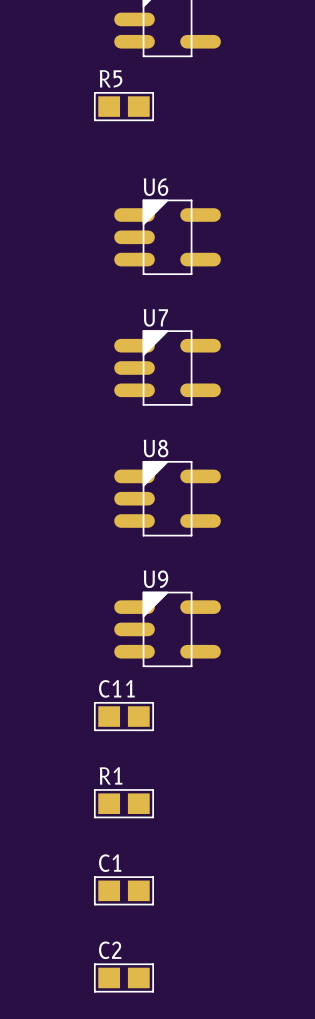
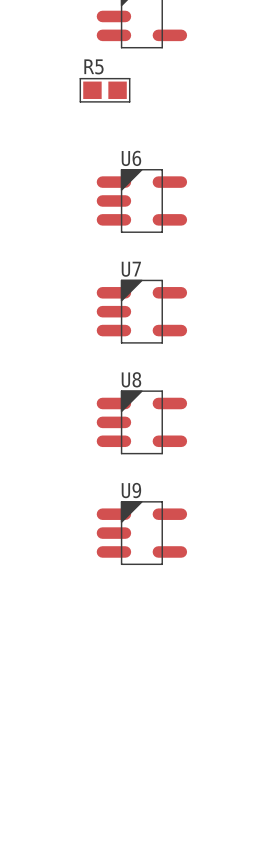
C11: (123, 716) -> none
R1: (123, 803) -> none
C1: (123, 890) -> none
C2: (123, 977) -> none

